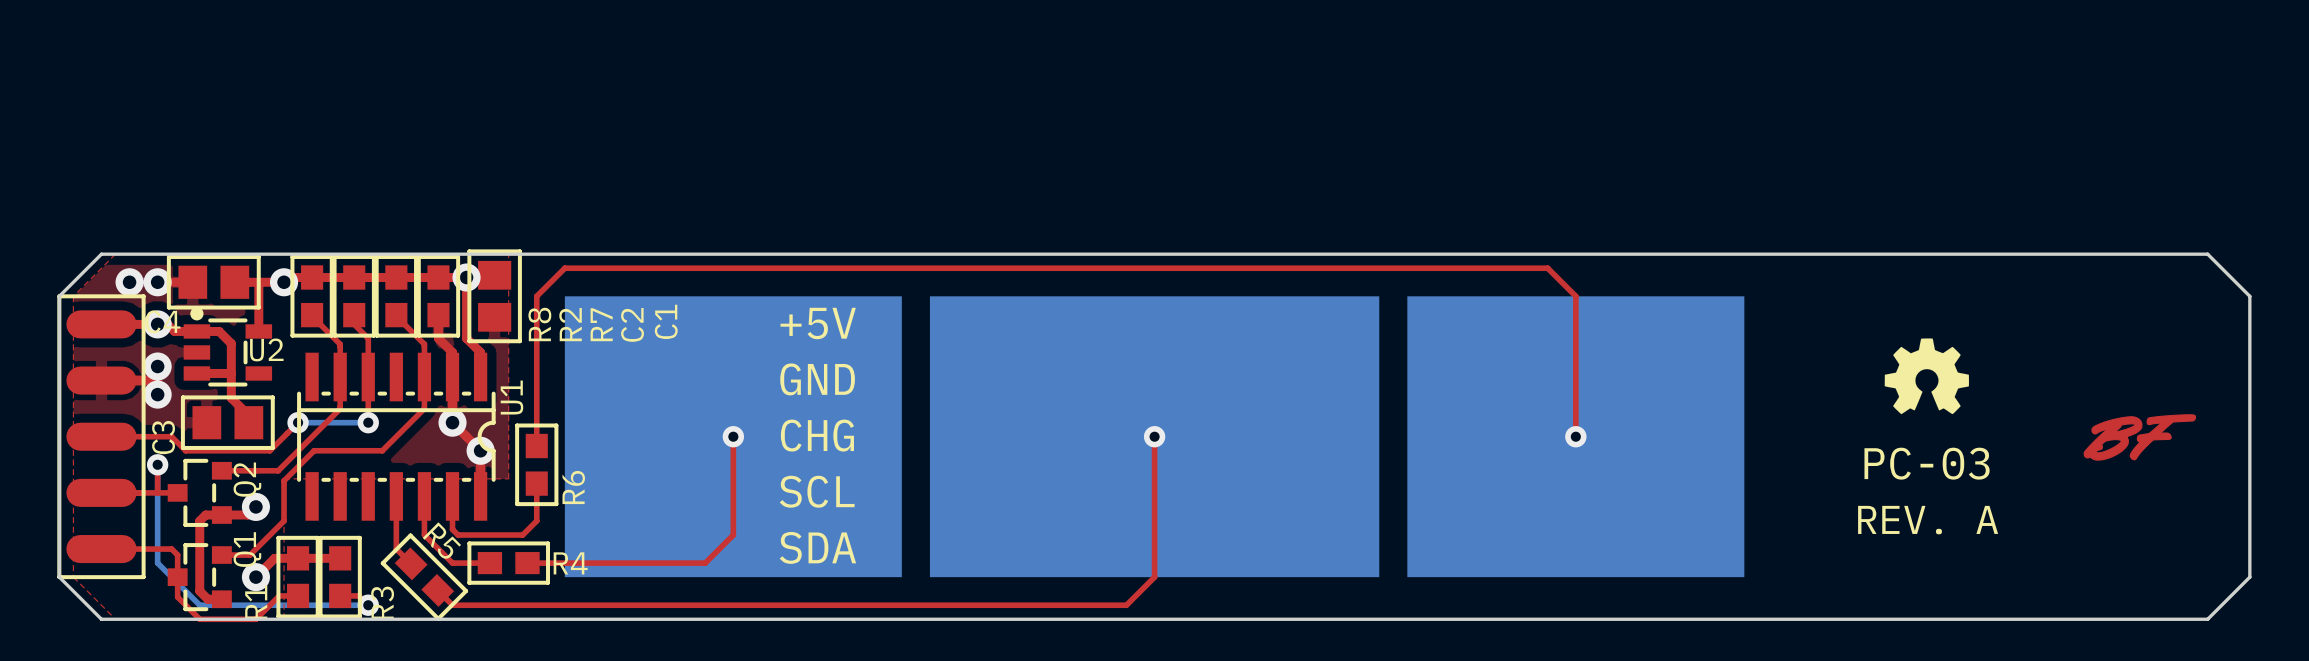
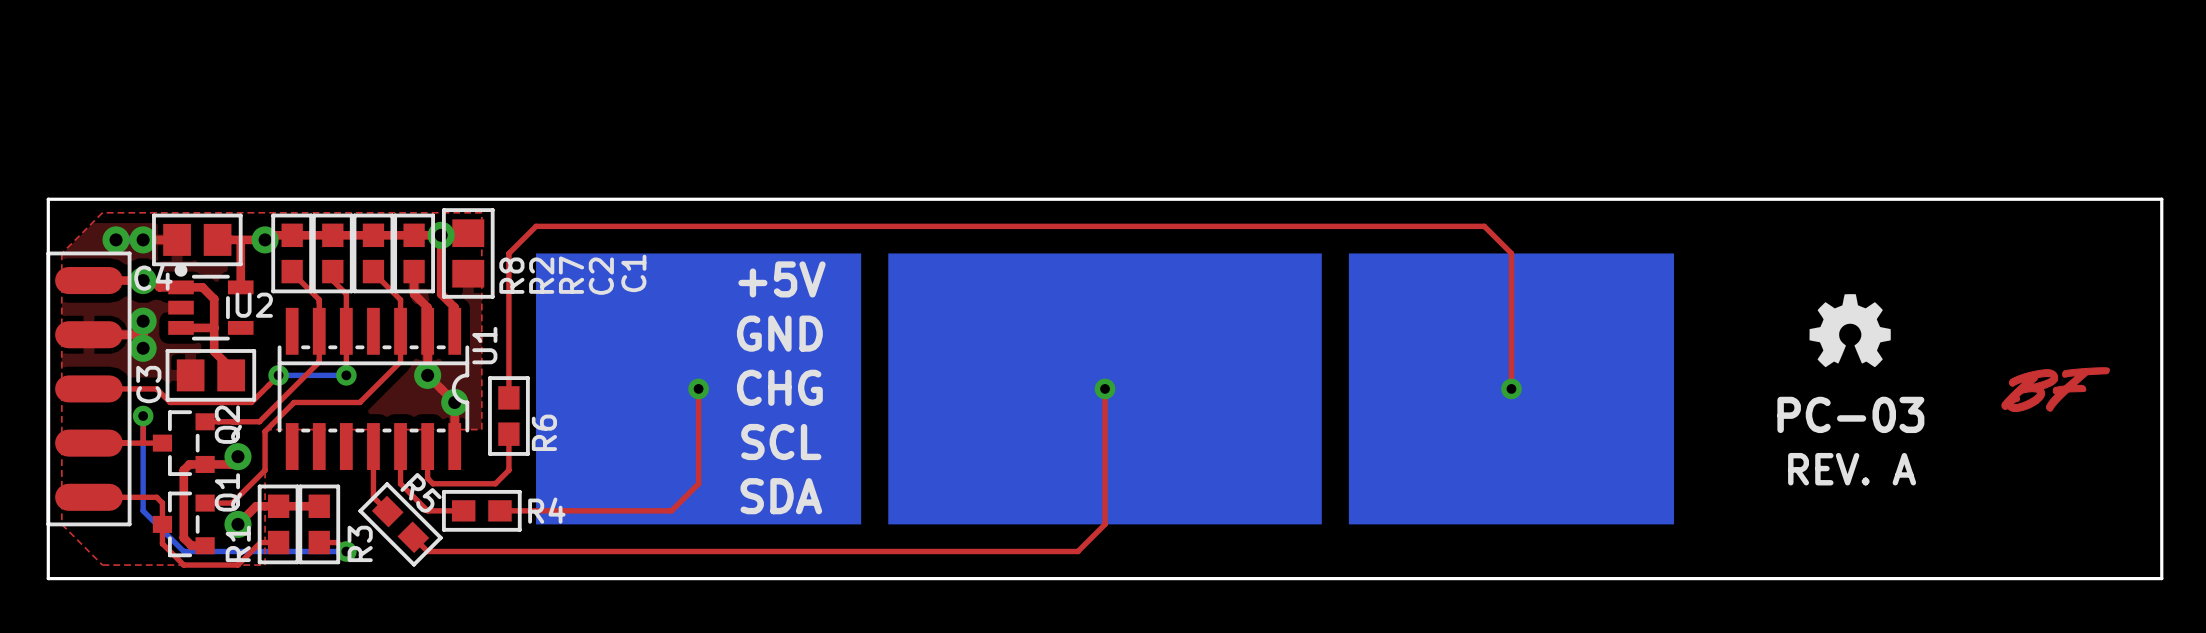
board edge: (59, 296) (101, 254) (2207, 254) (2249, 296) -> (48, 253) (48, 199) (2161, 199) (2161, 253)
board edge: (59, 577) (101, 619) (2207, 619) (2249, 577) -> (48, 524) (48, 578) (2161, 578) (2161, 524)

